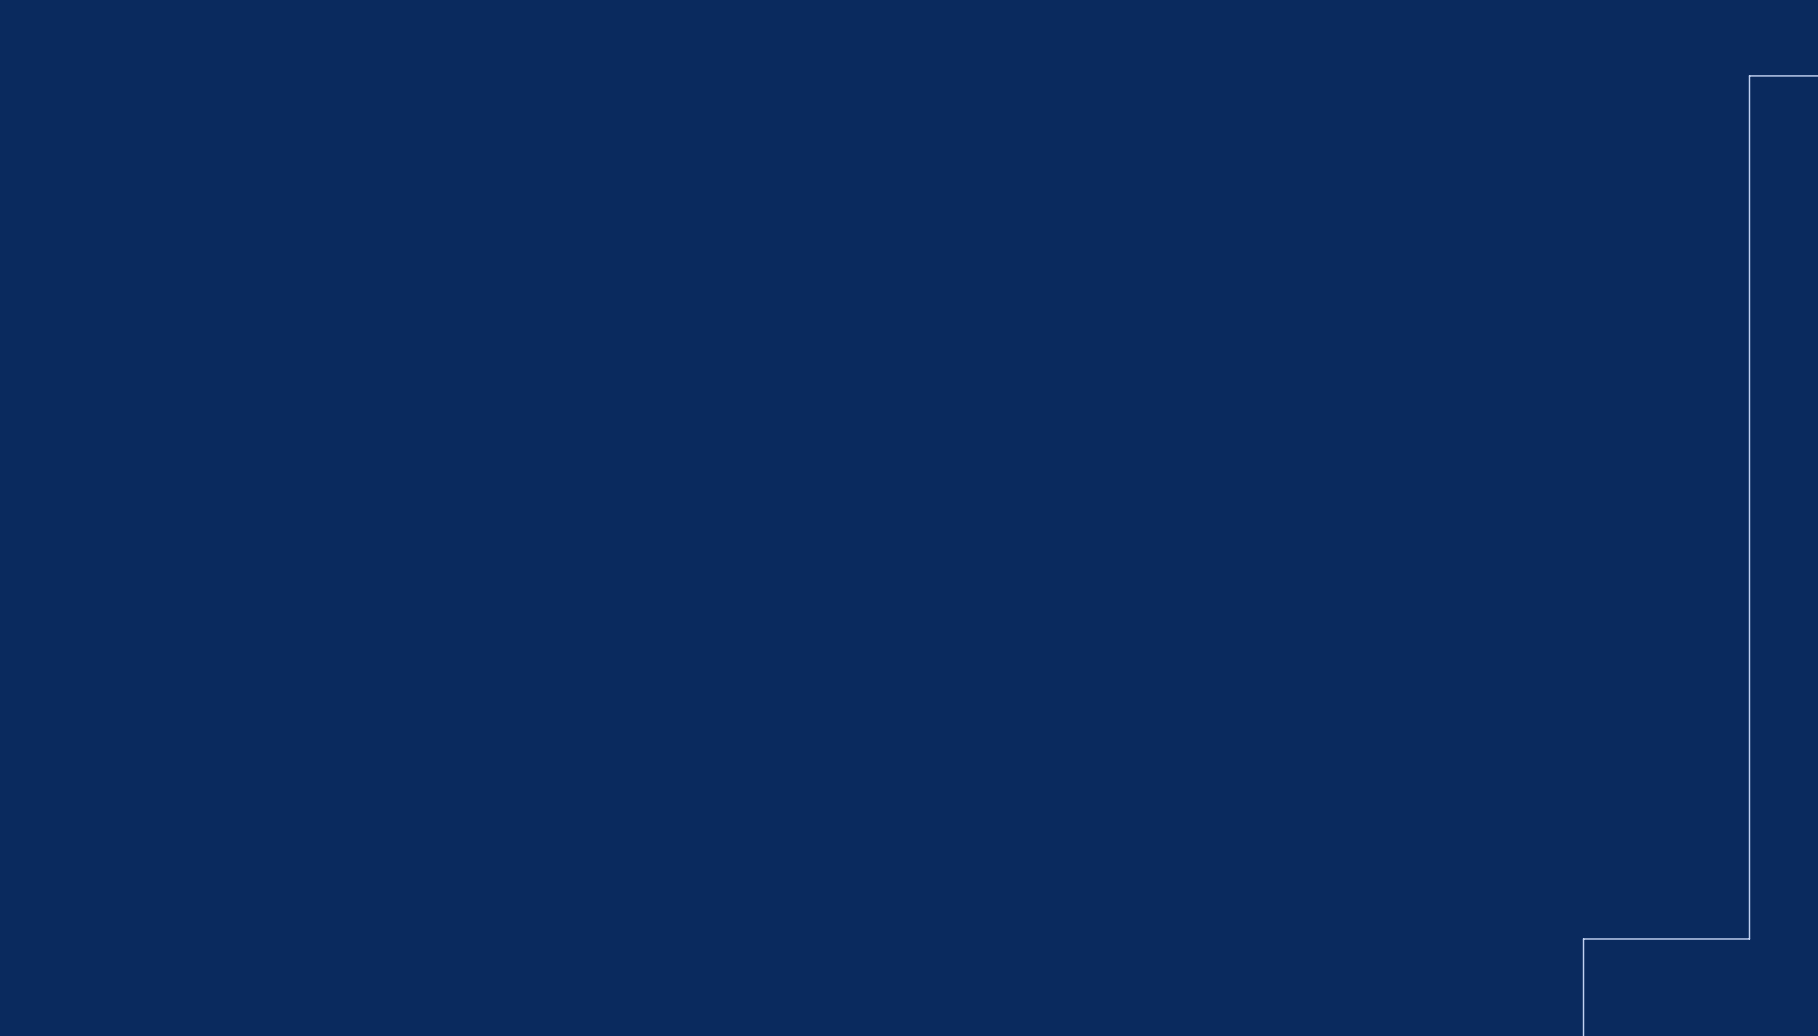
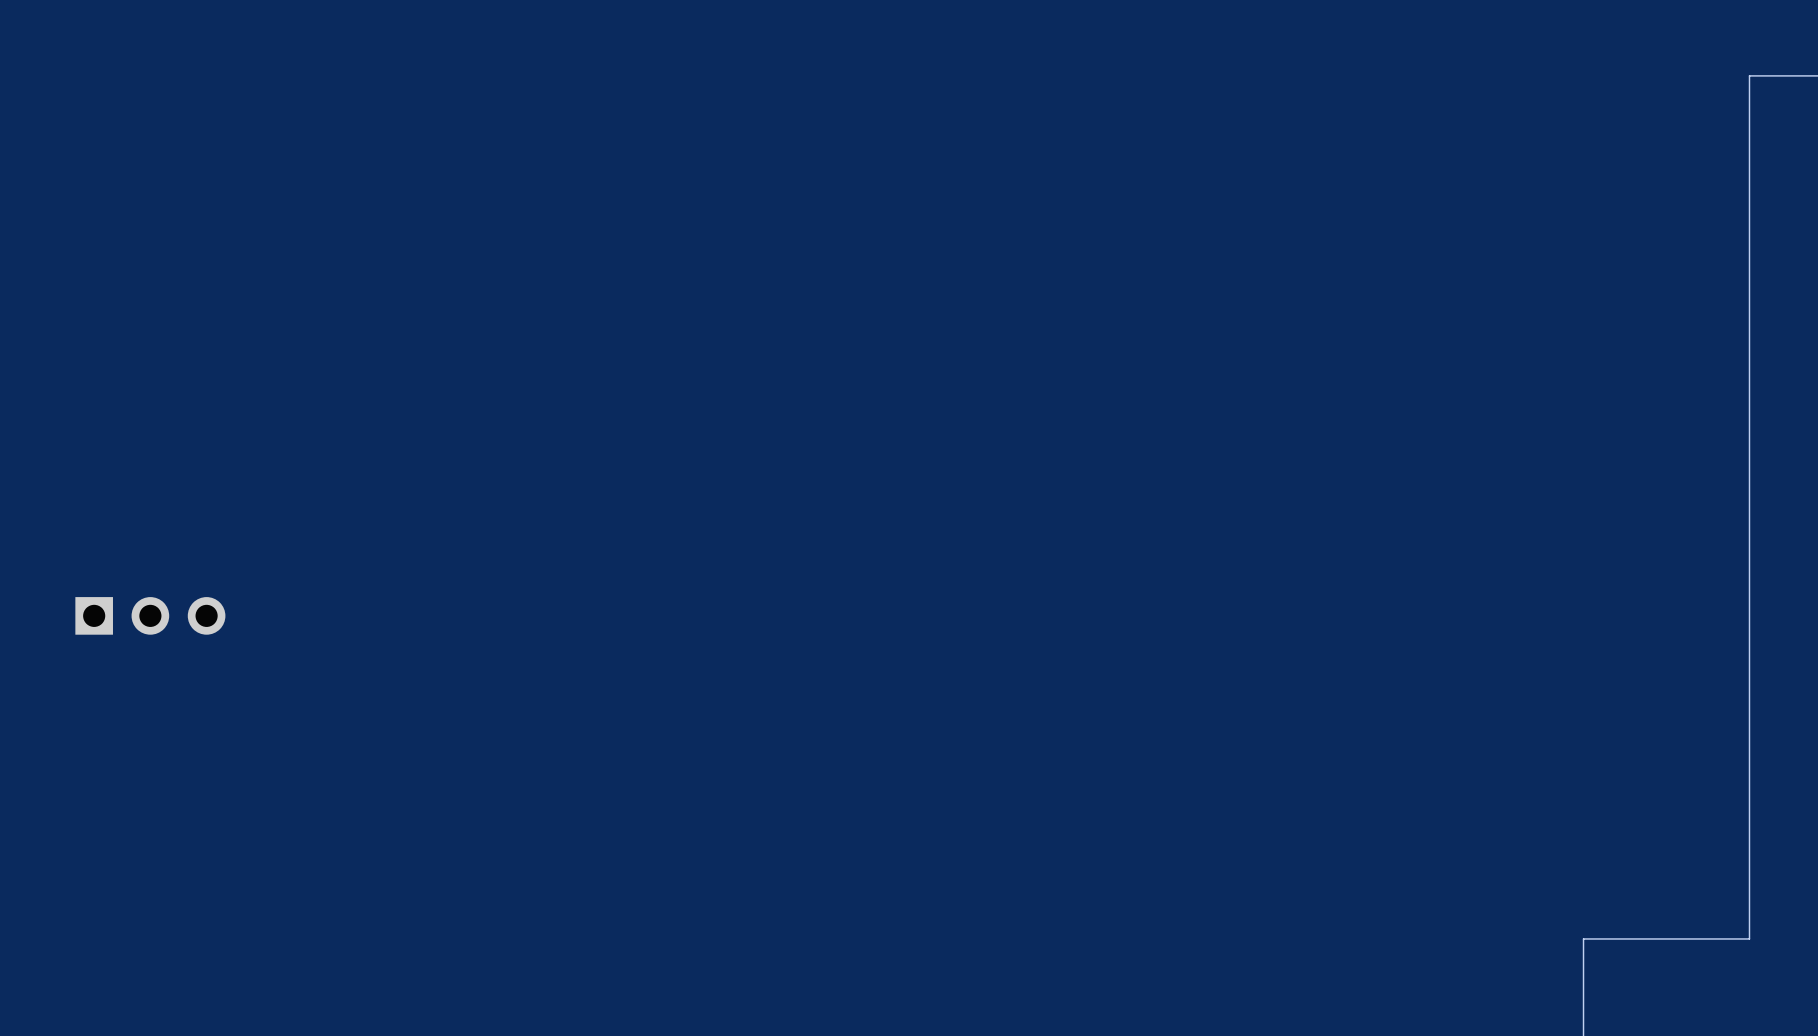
part: none -> (150, 615)

